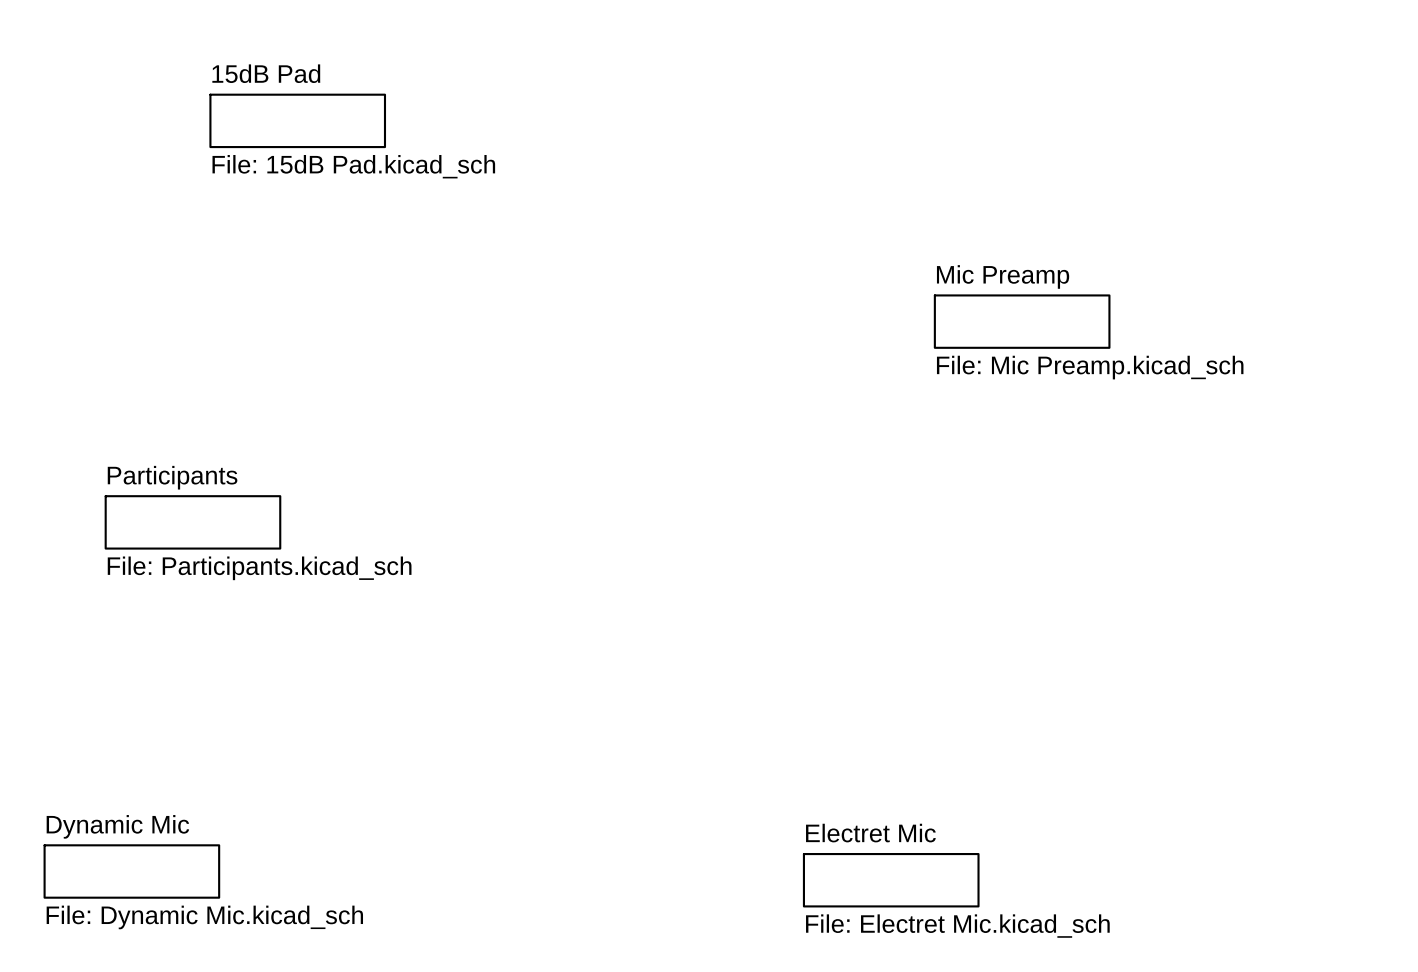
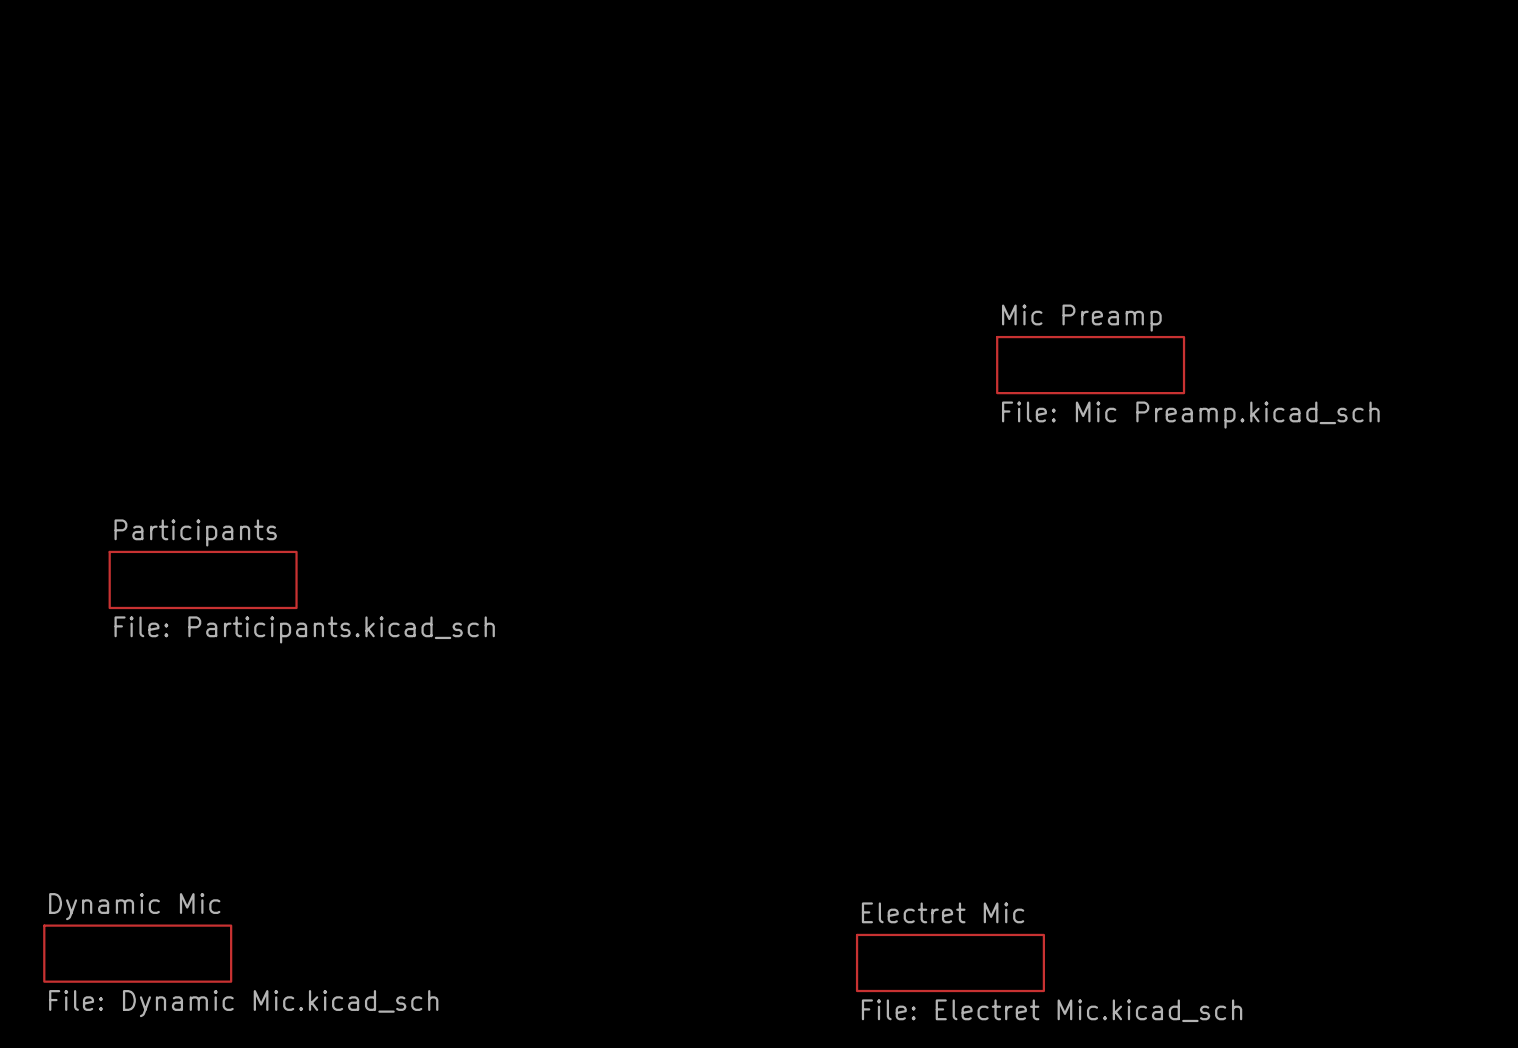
sheet 15dB Pad: File: 15dB Pad.kicad_sch (297, 120) -> none

